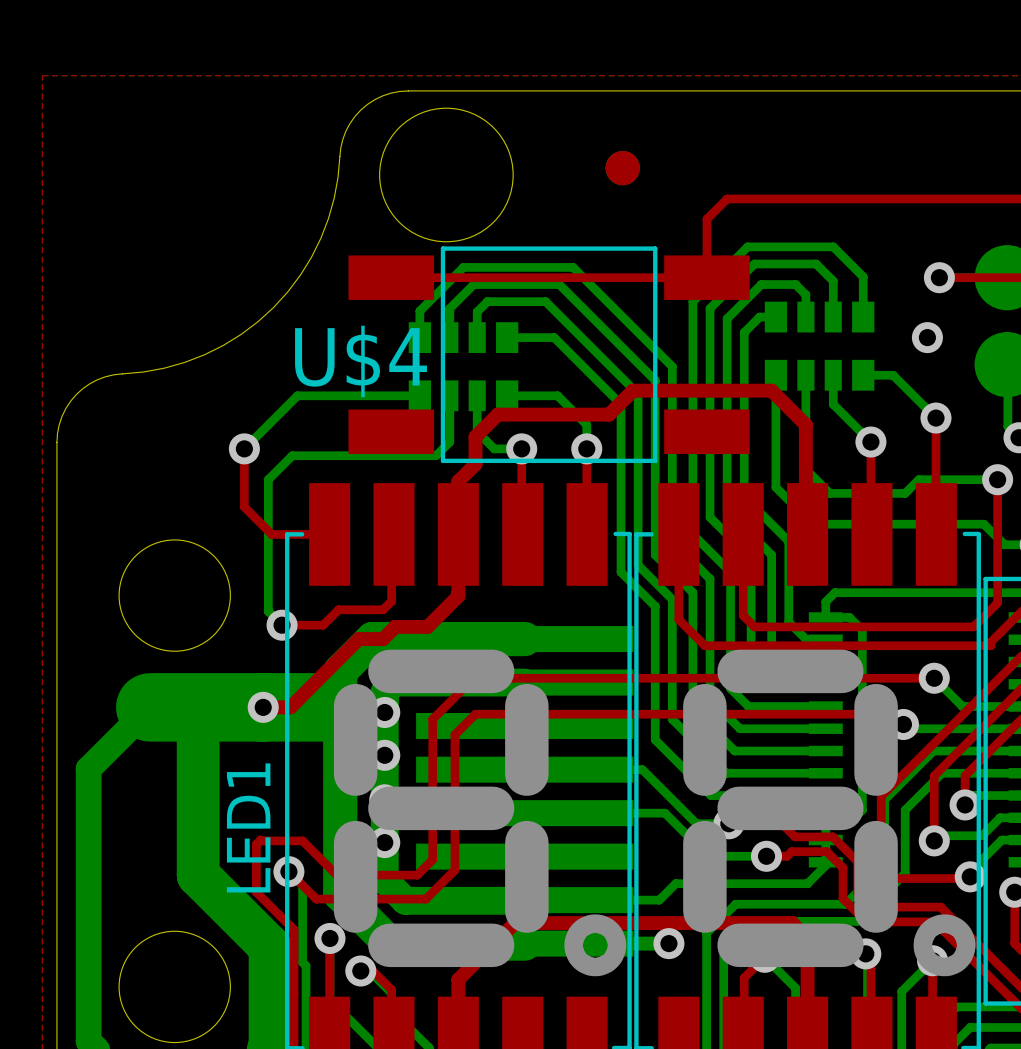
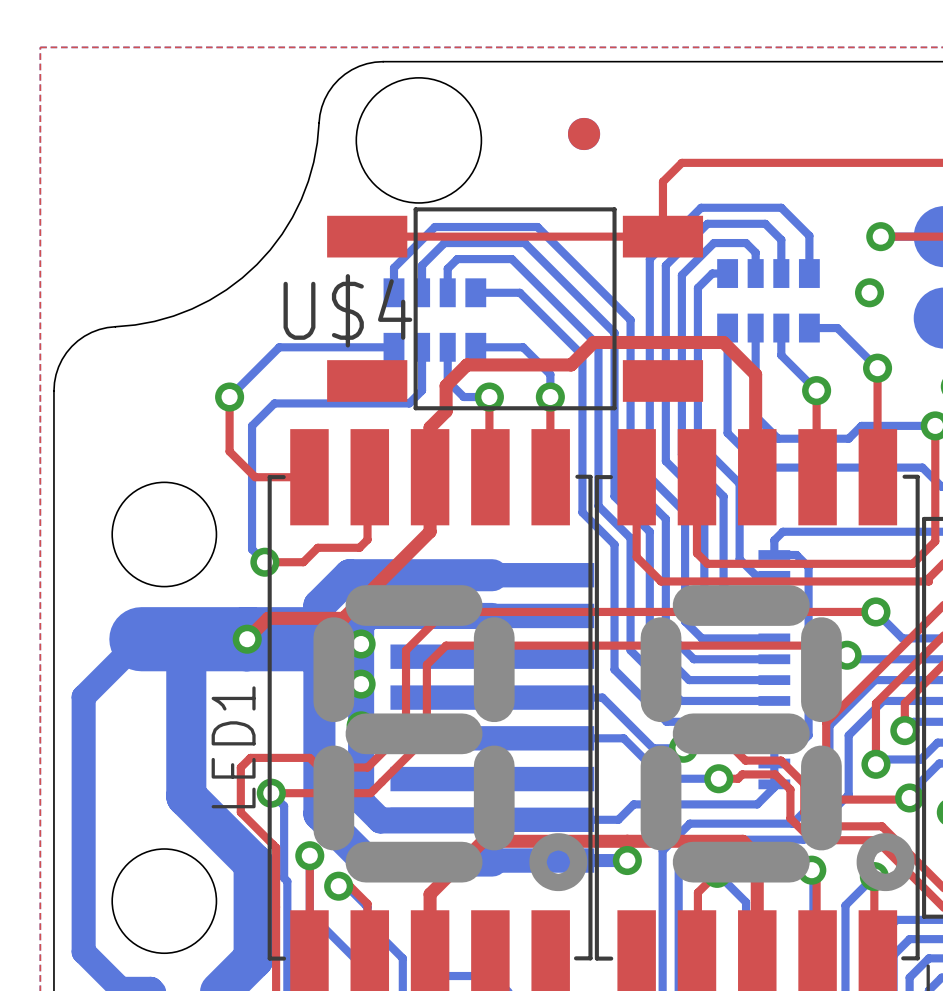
top track: (458, 592) (458, 596) (427, 626) (395, 626) (383, 639) (358, 639) (290, 707) (263, 707) -> (430, 531) (343, 618) (268, 618) (247, 639)
top track: (432, 803) (432, 859) (417, 875) (336, 875) (302, 840) (260, 840) -> (406, 729) (367, 767) (319, 767) (309, 757) (250, 757) (244, 763)
top track: (454, 811) (454, 869) (425, 899) (316, 899) (288, 871) -> (426, 737) (370, 793) (271, 793)
via: (384, 842) -> none

